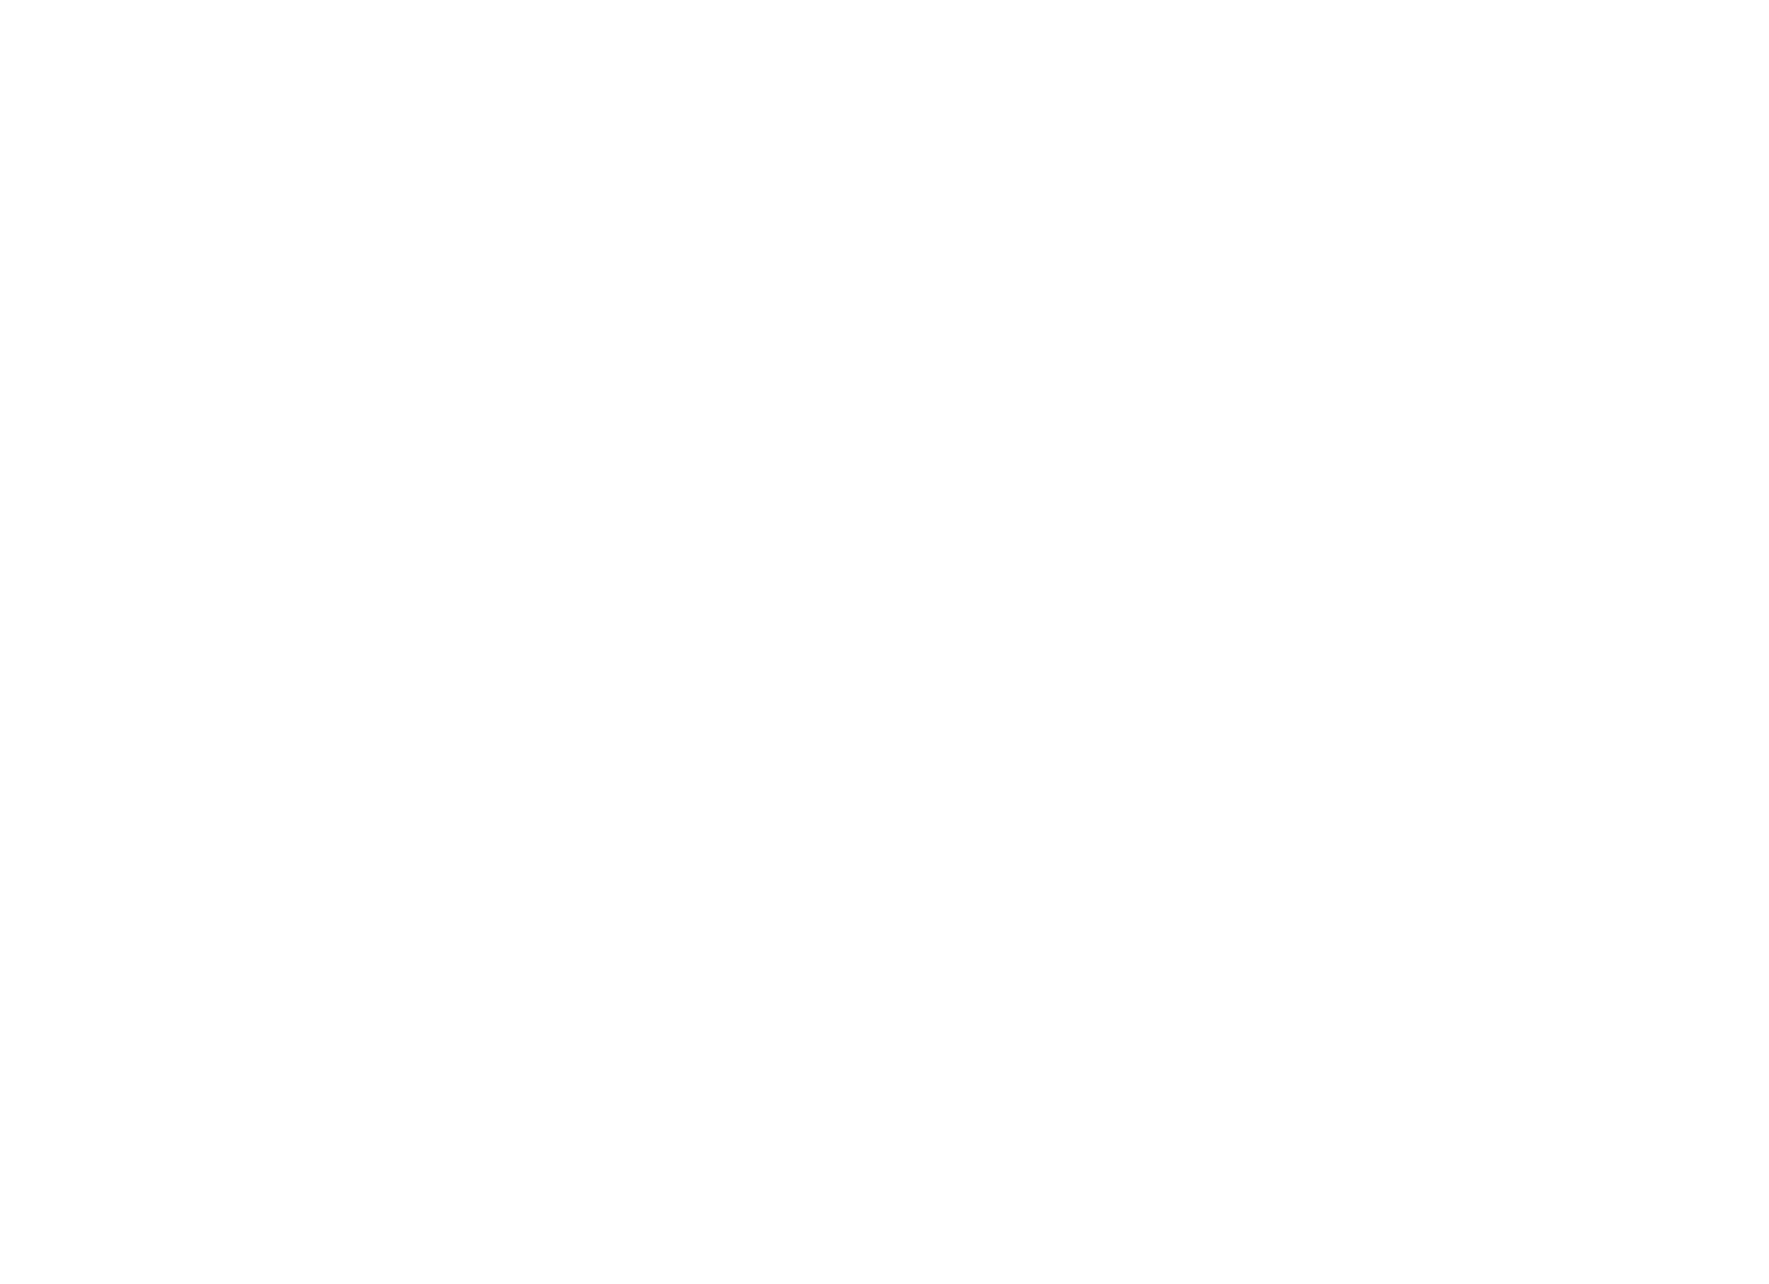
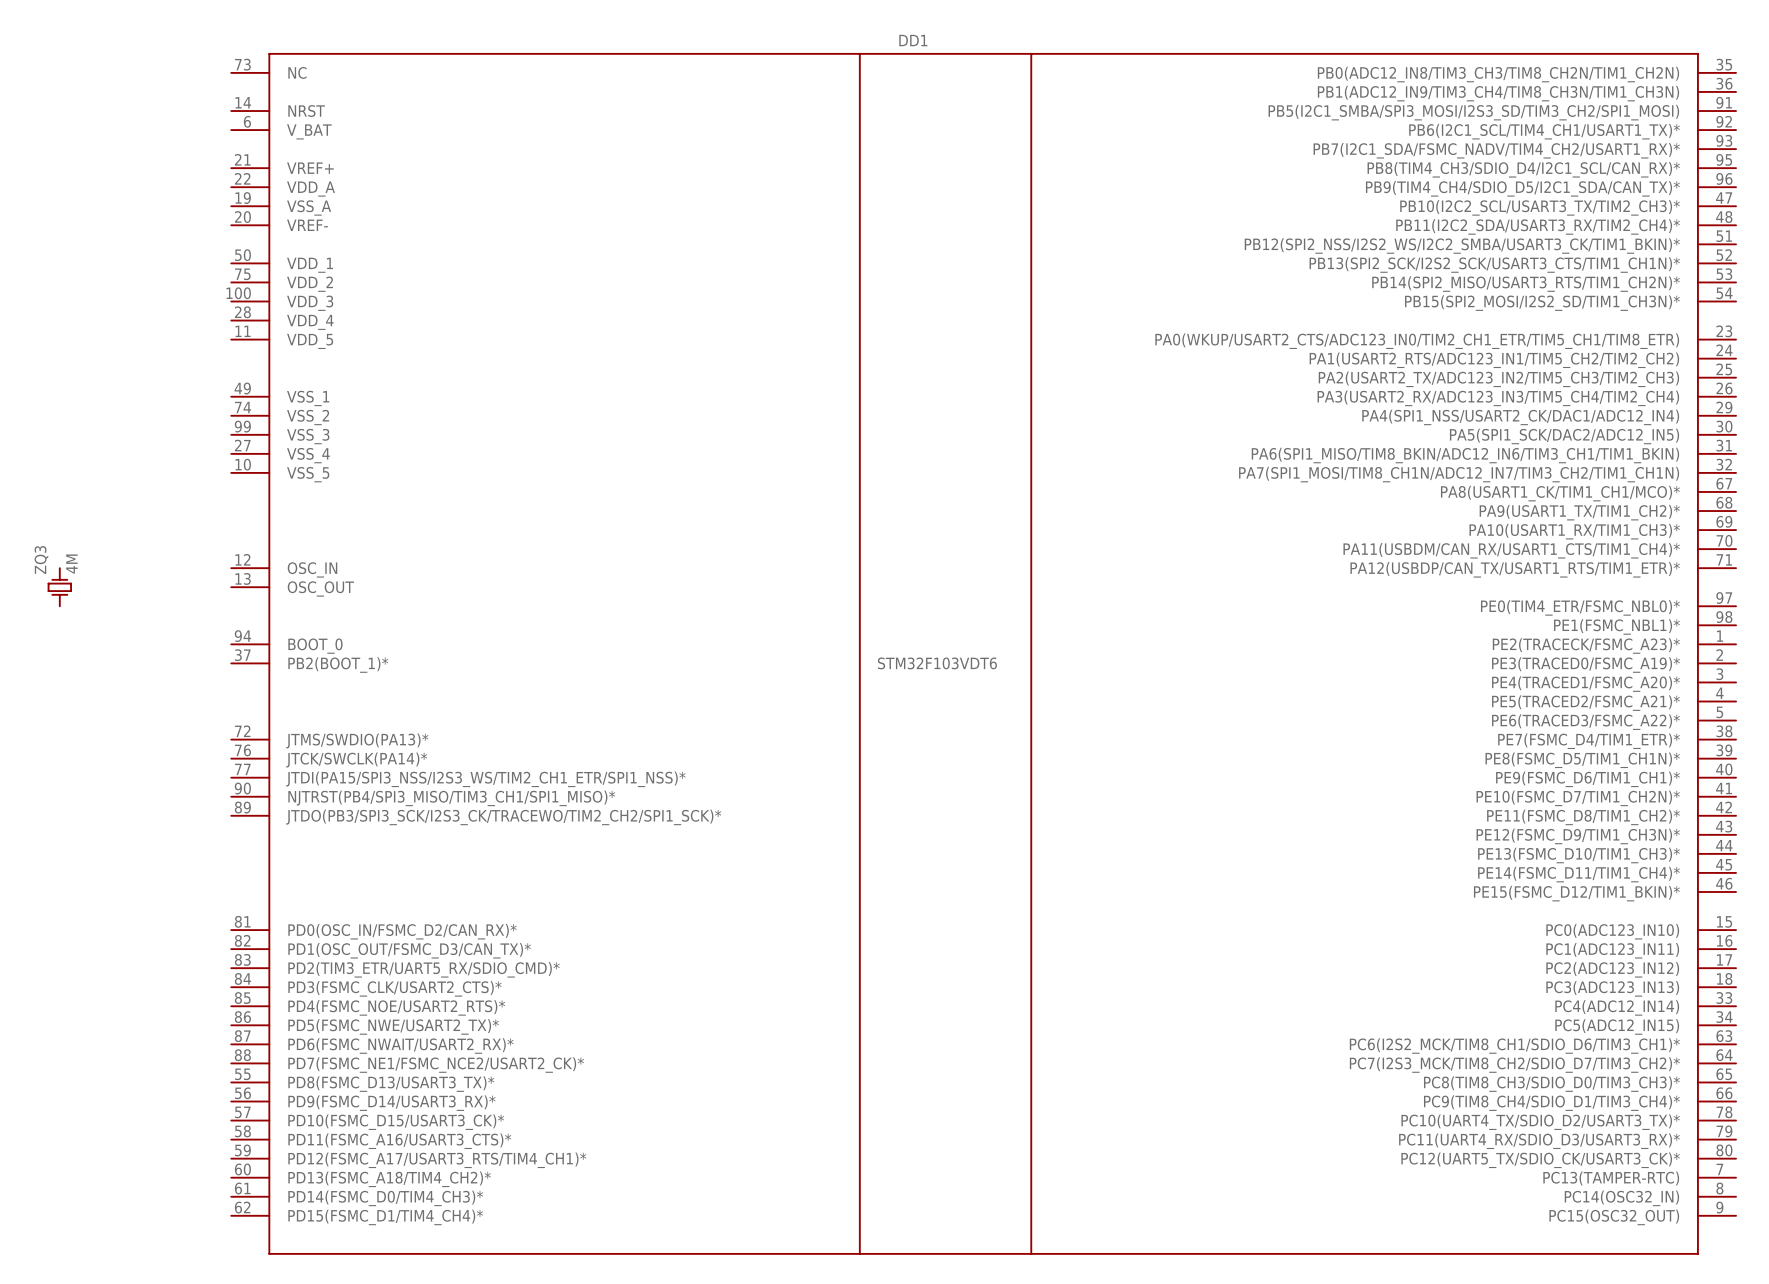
ZQ3: none -> 4M (59, 587)
DD1: none -> STM32F103VDT6 (983, 653)

